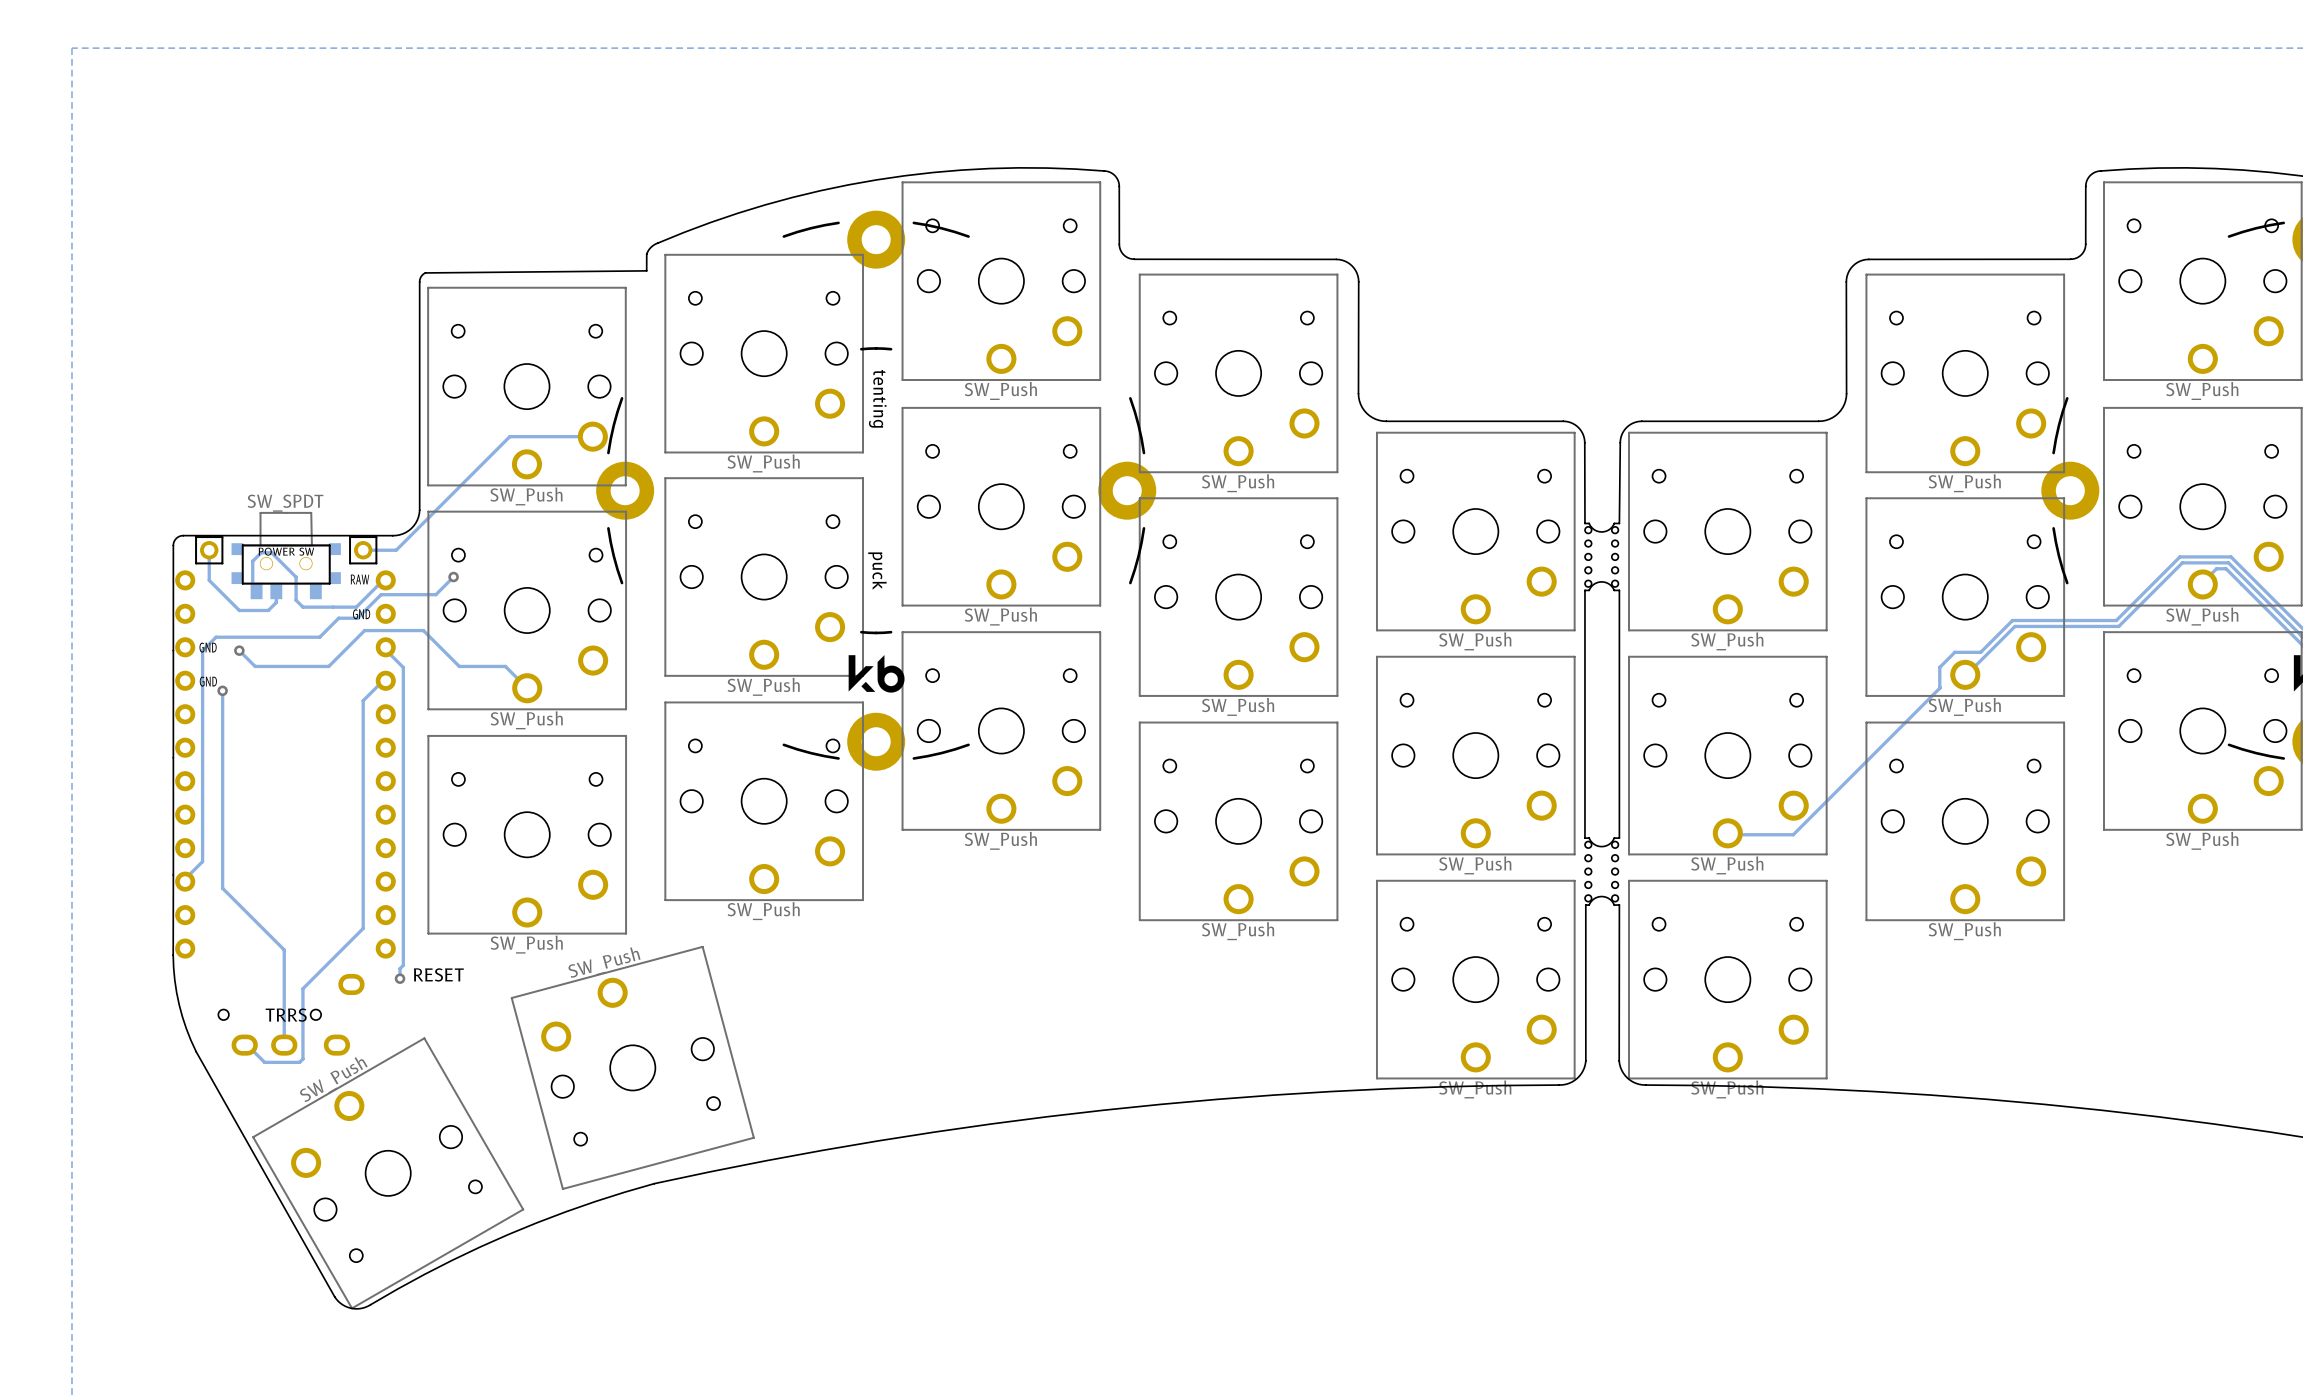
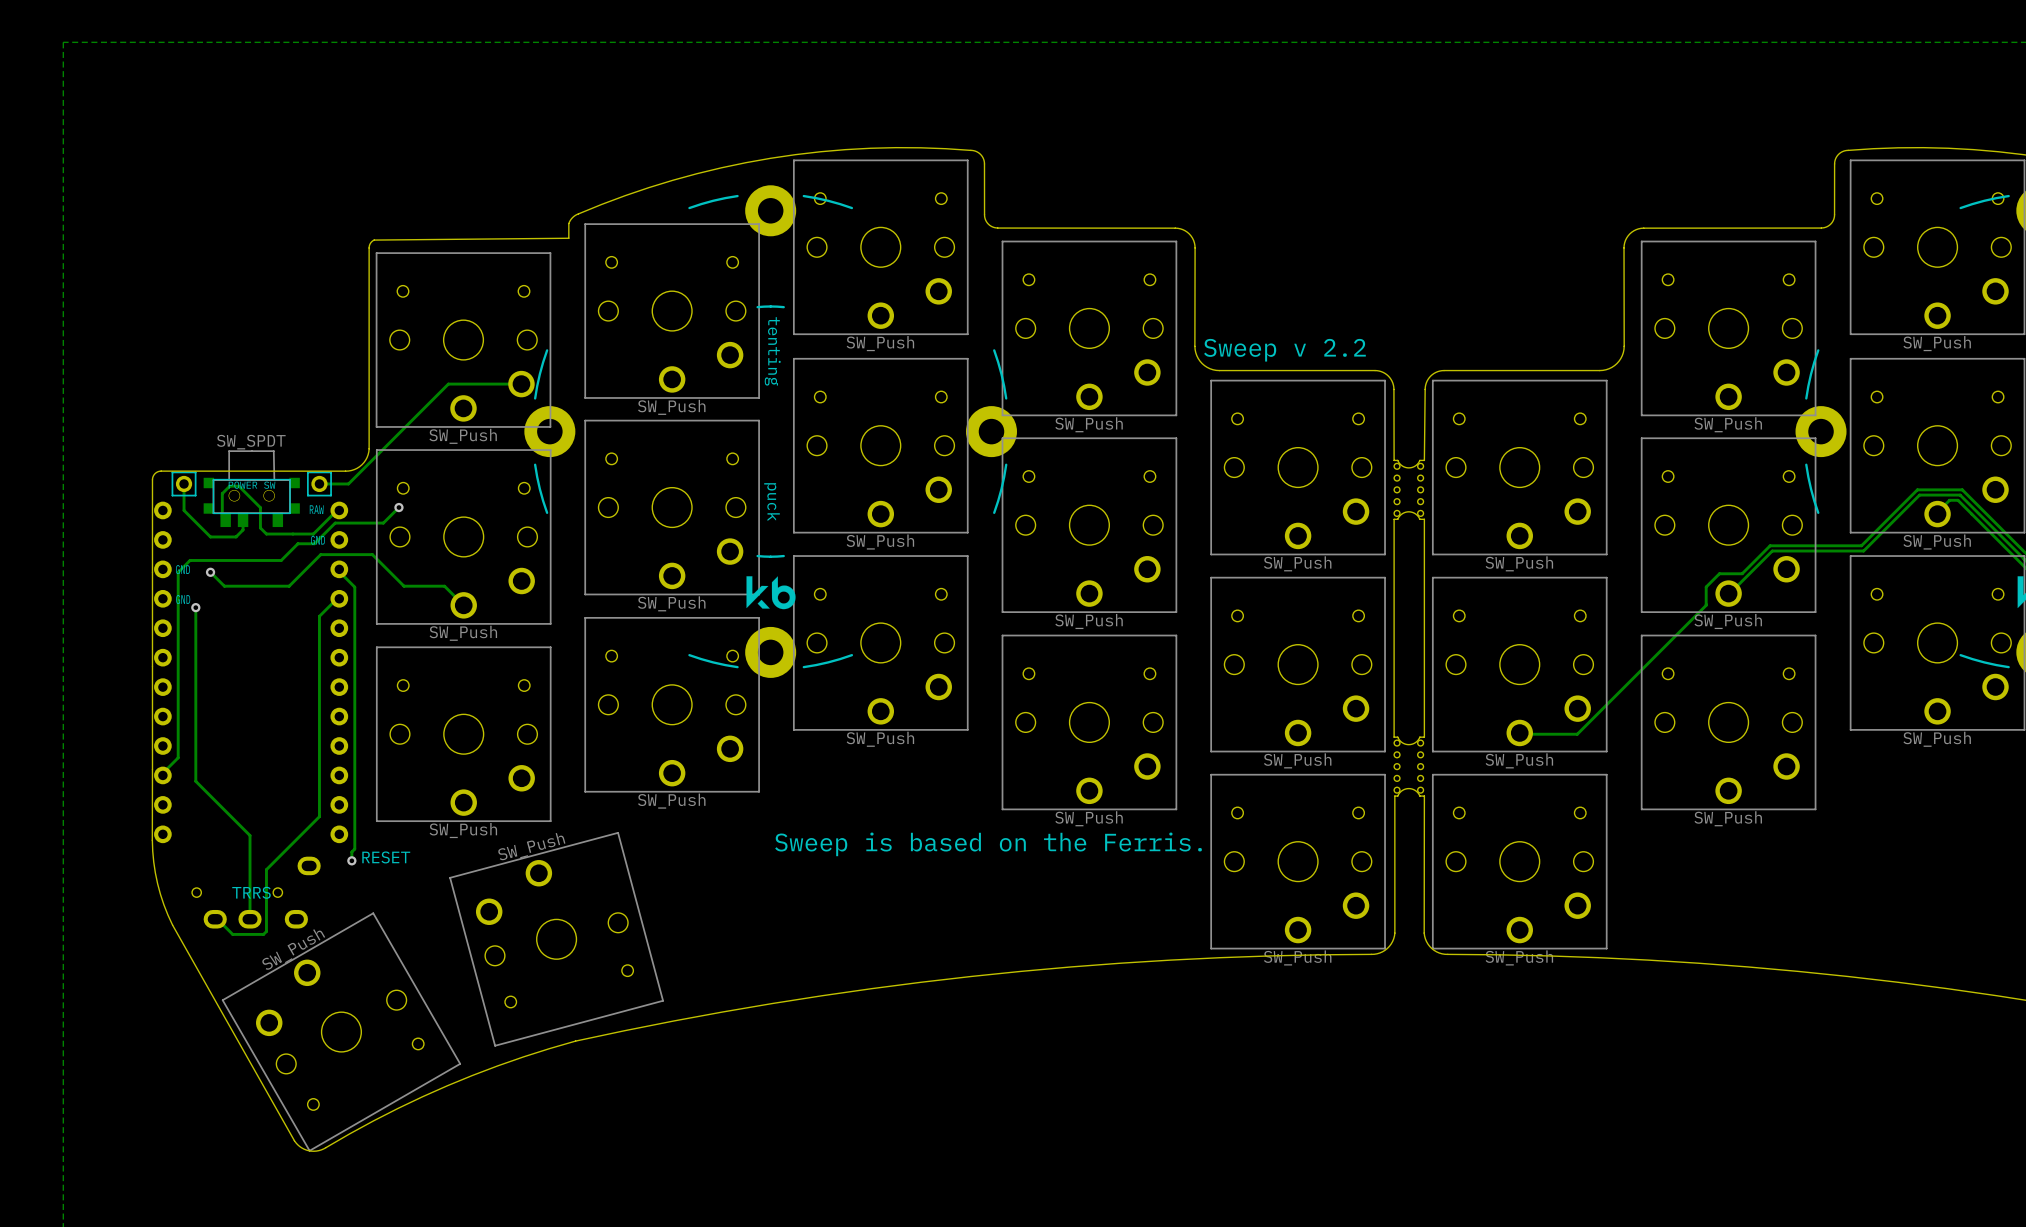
text: none -> Sweep v 2.2 (1284, 350)
text: none -> Sweep is based on the Ferris. (988, 844)

